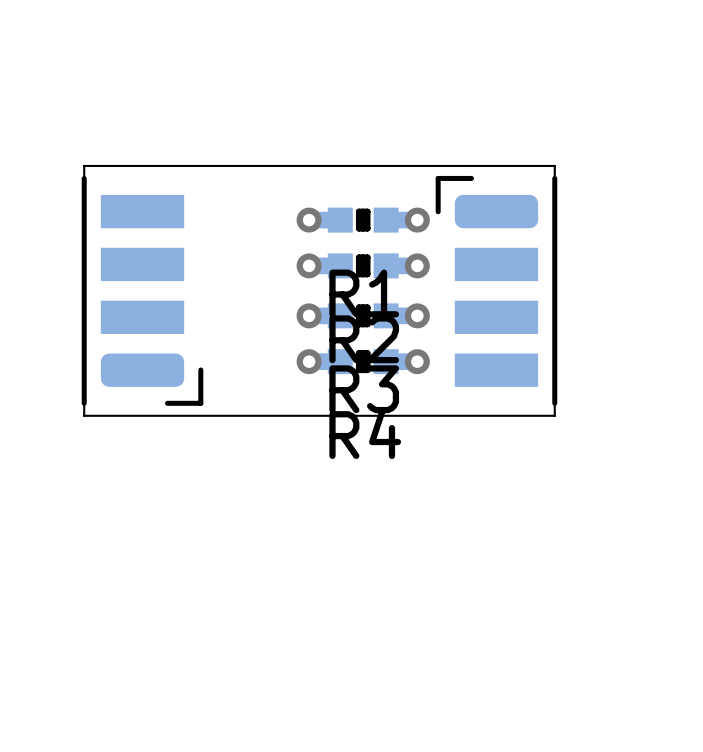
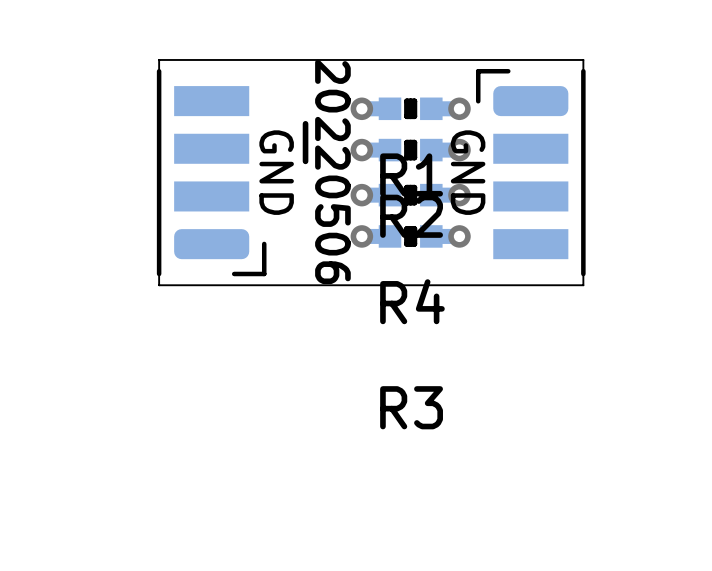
drawing: none -> [302, 120, 309, 165]
text: none -> GND (276, 172)
text: none -> GND (468, 172)
R3 name position: R3 (364, 389) -> R3 (411, 407)

